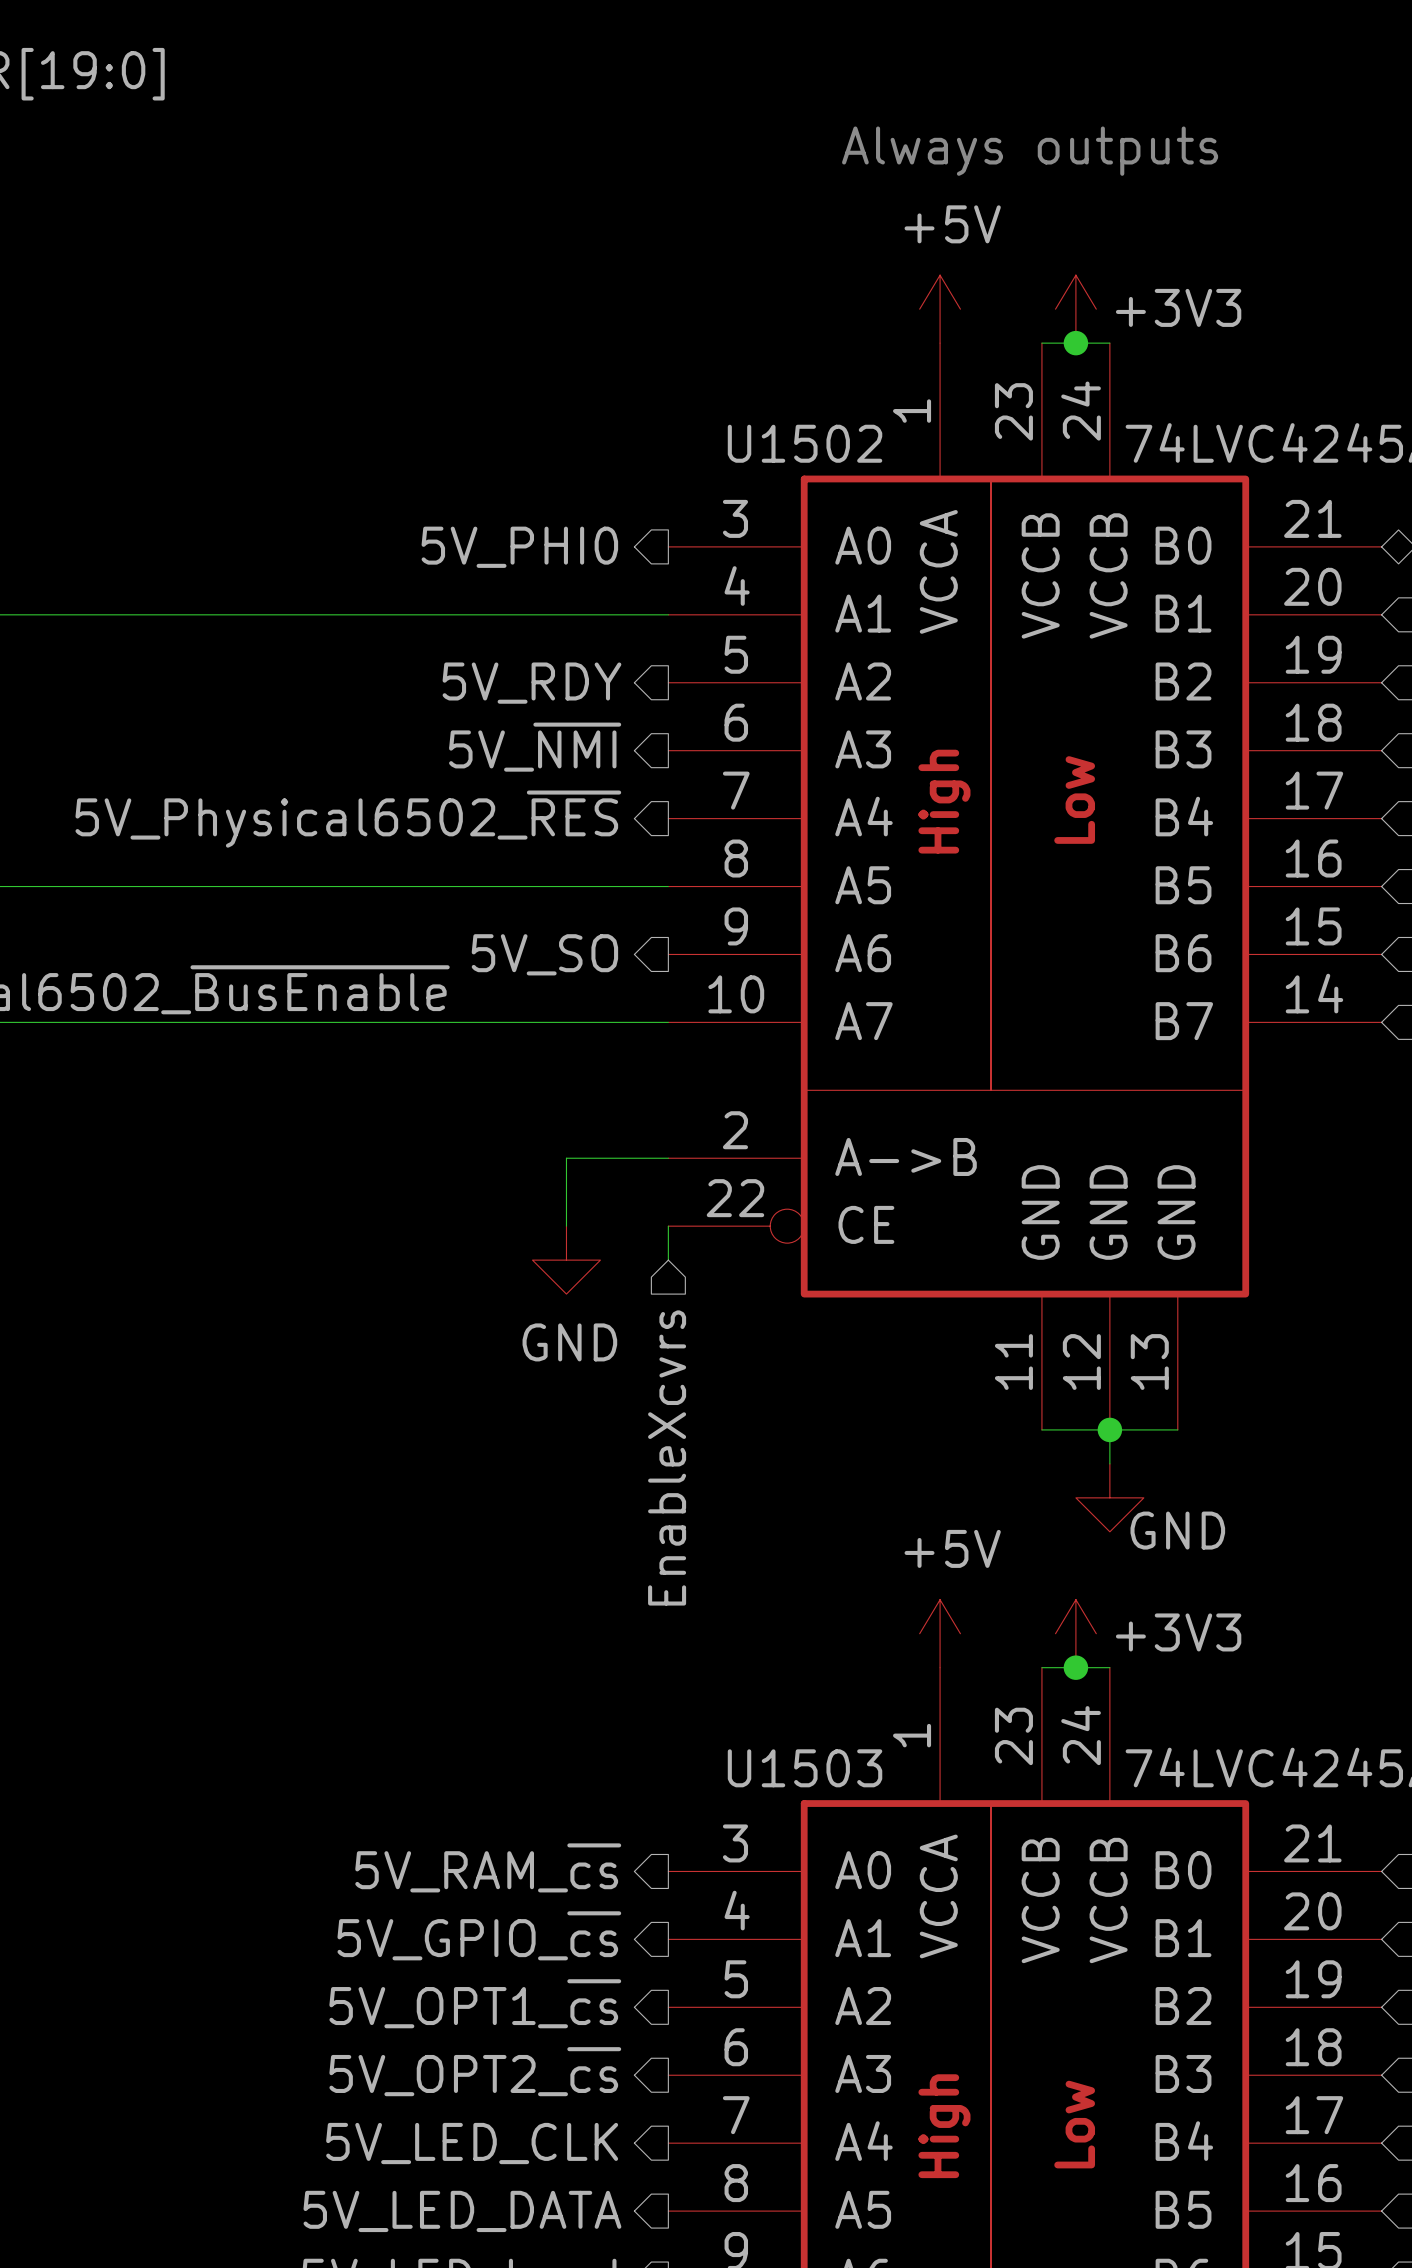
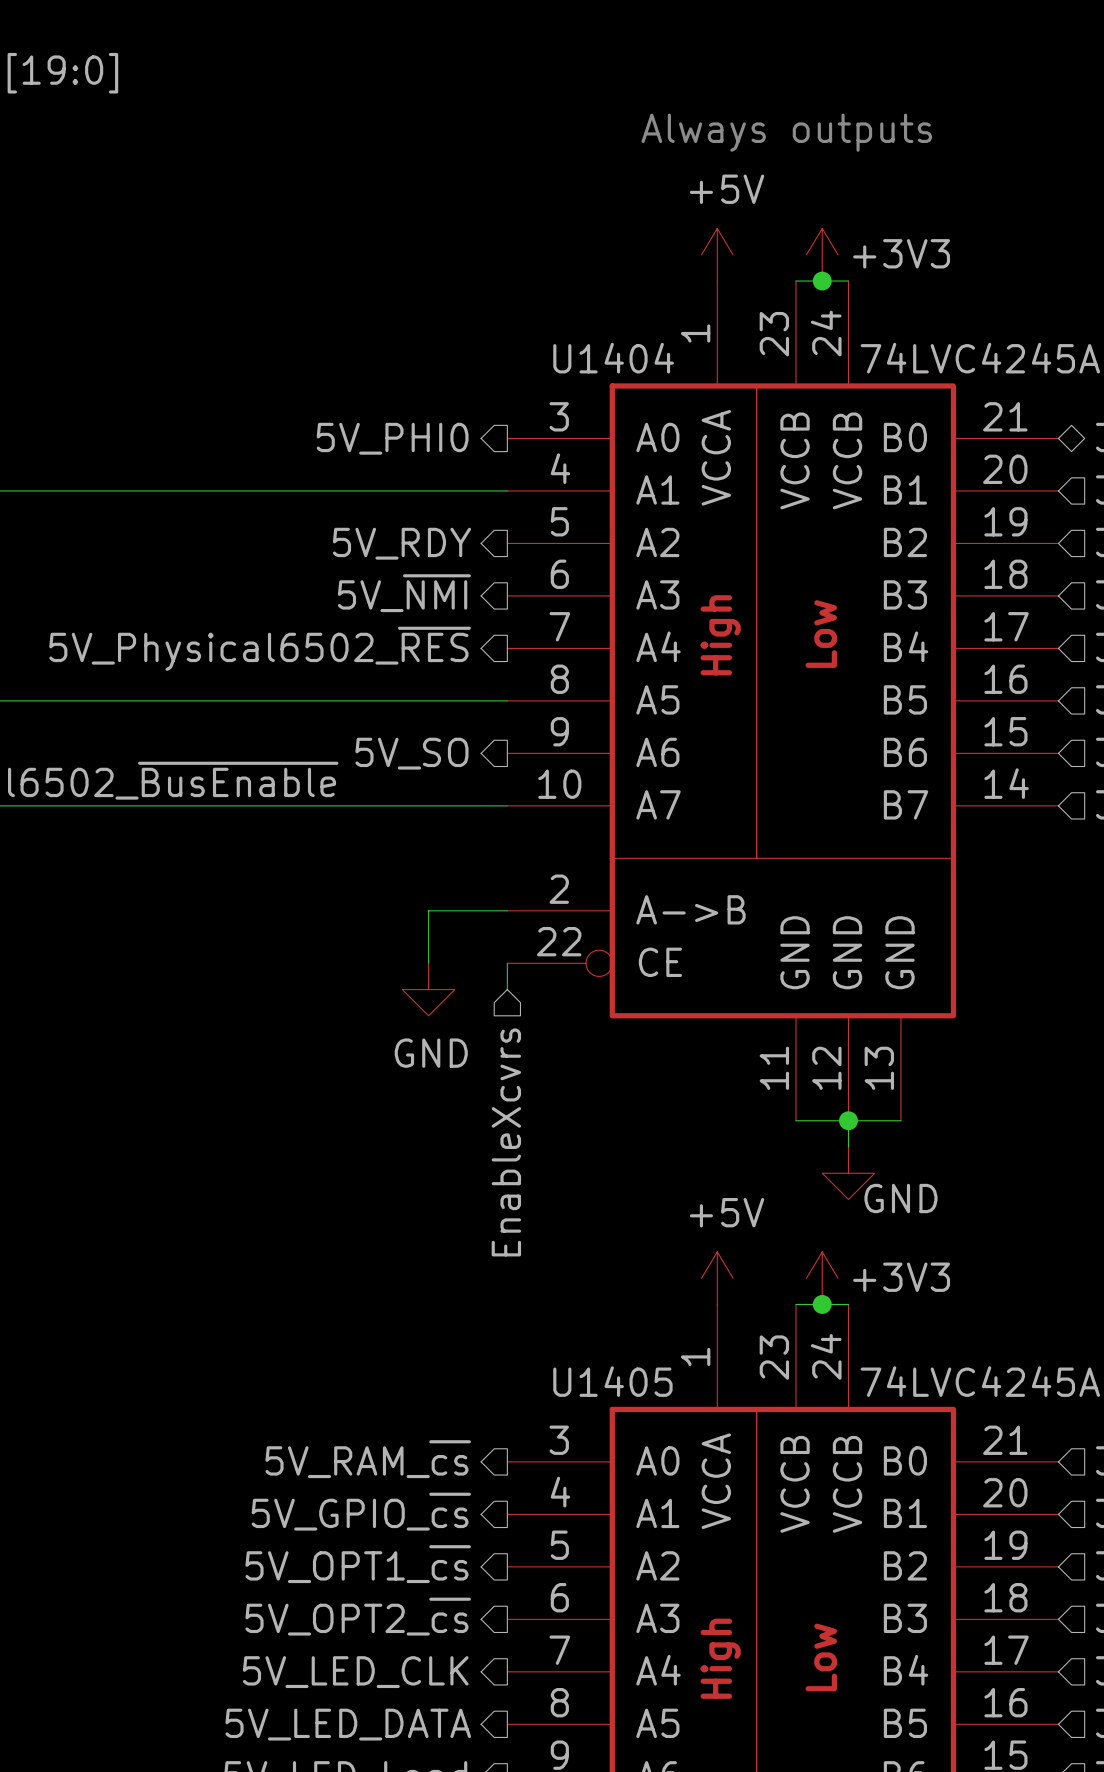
U1502 name: U1502 (805, 443) -> U1404 (613, 358)
U1503 name: U1503 (805, 1768) -> U1405 (612, 1381)

